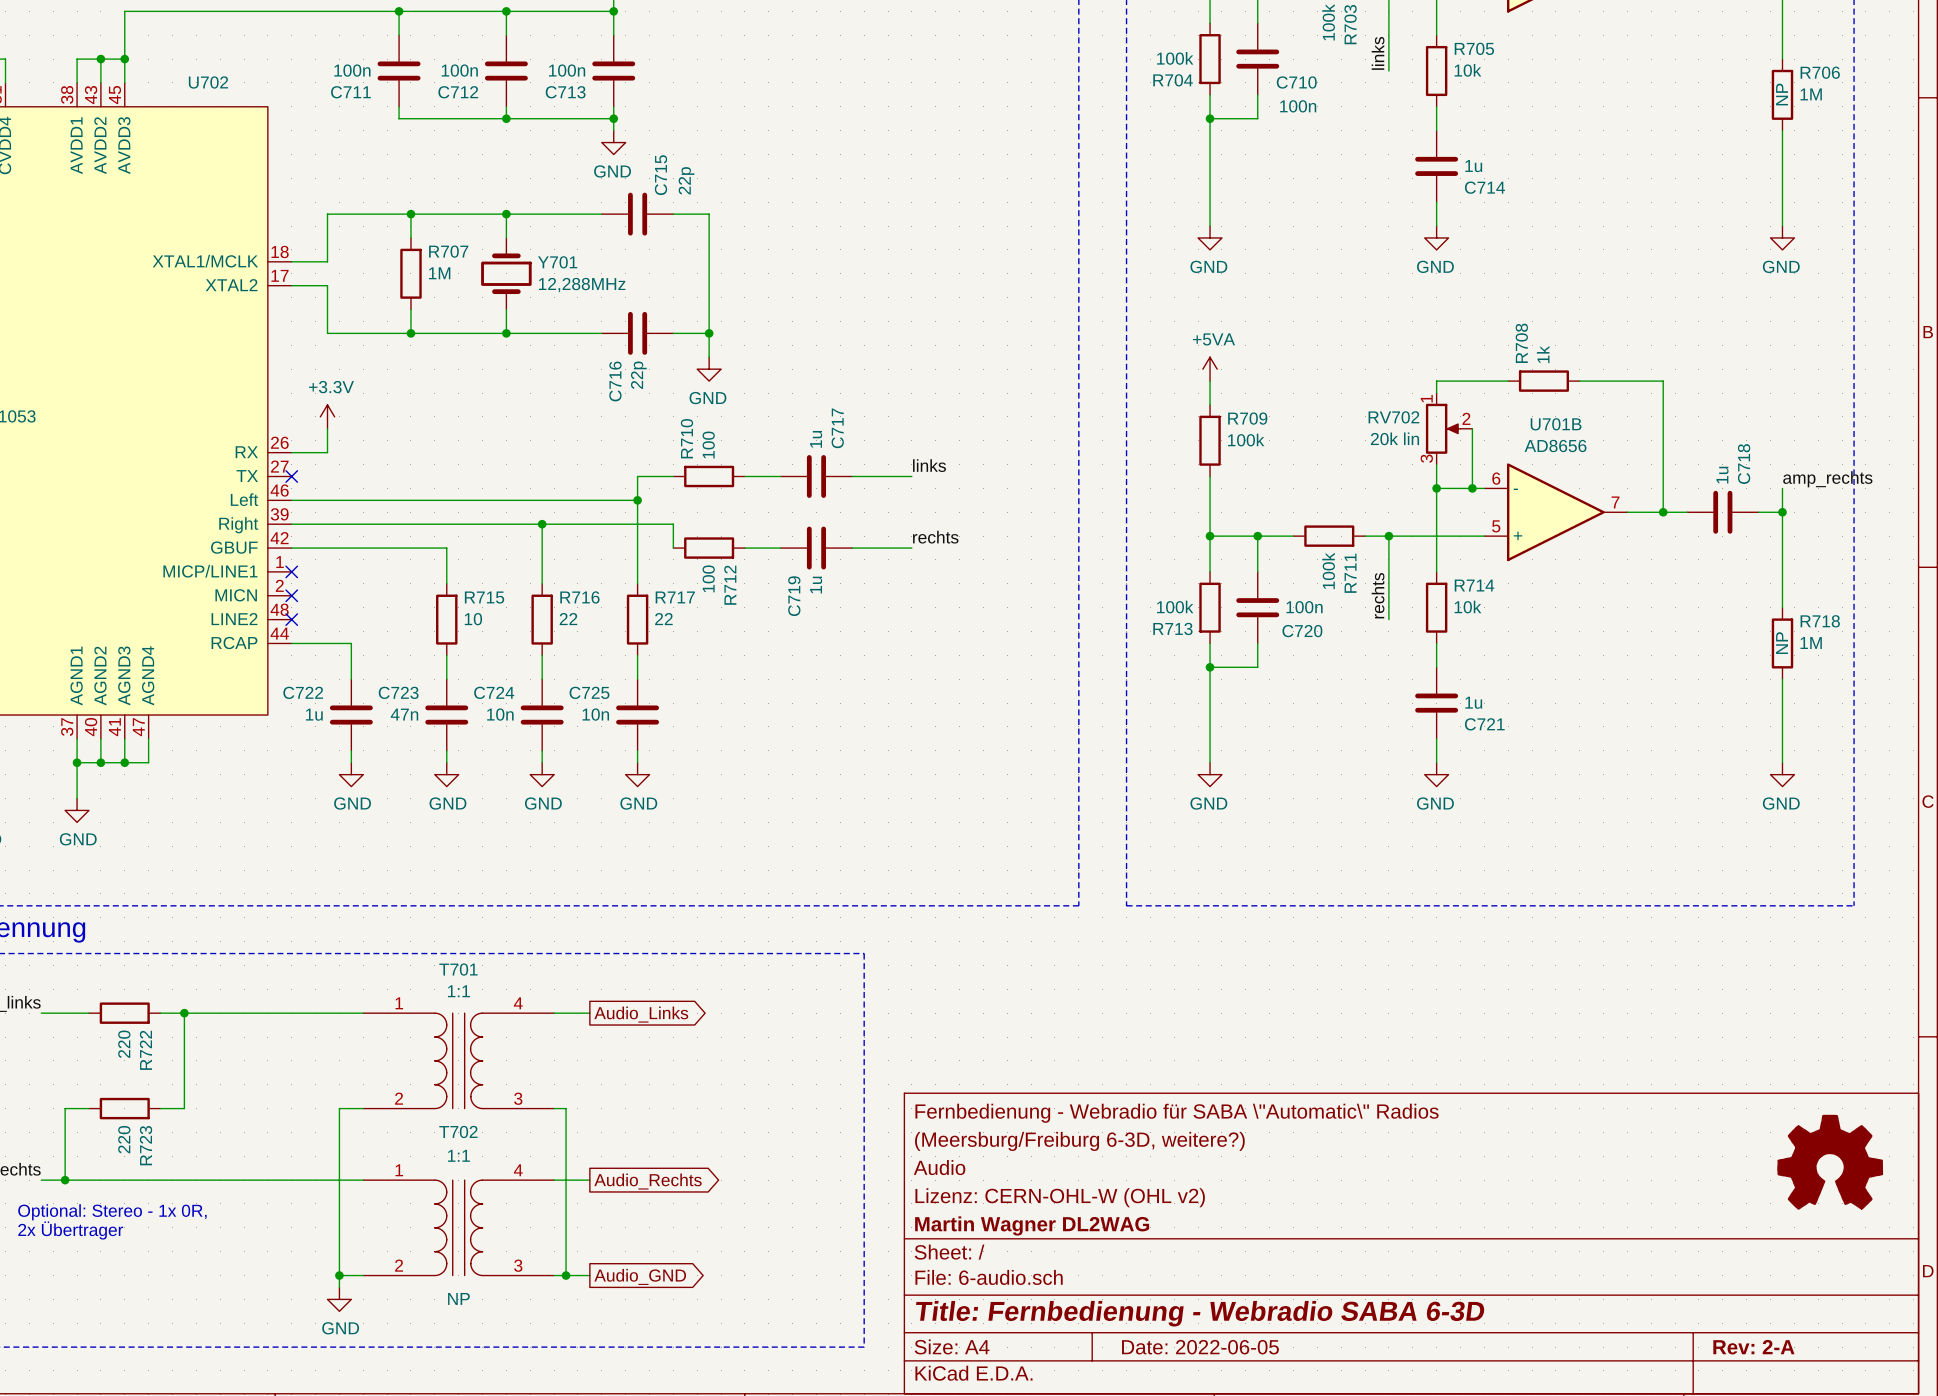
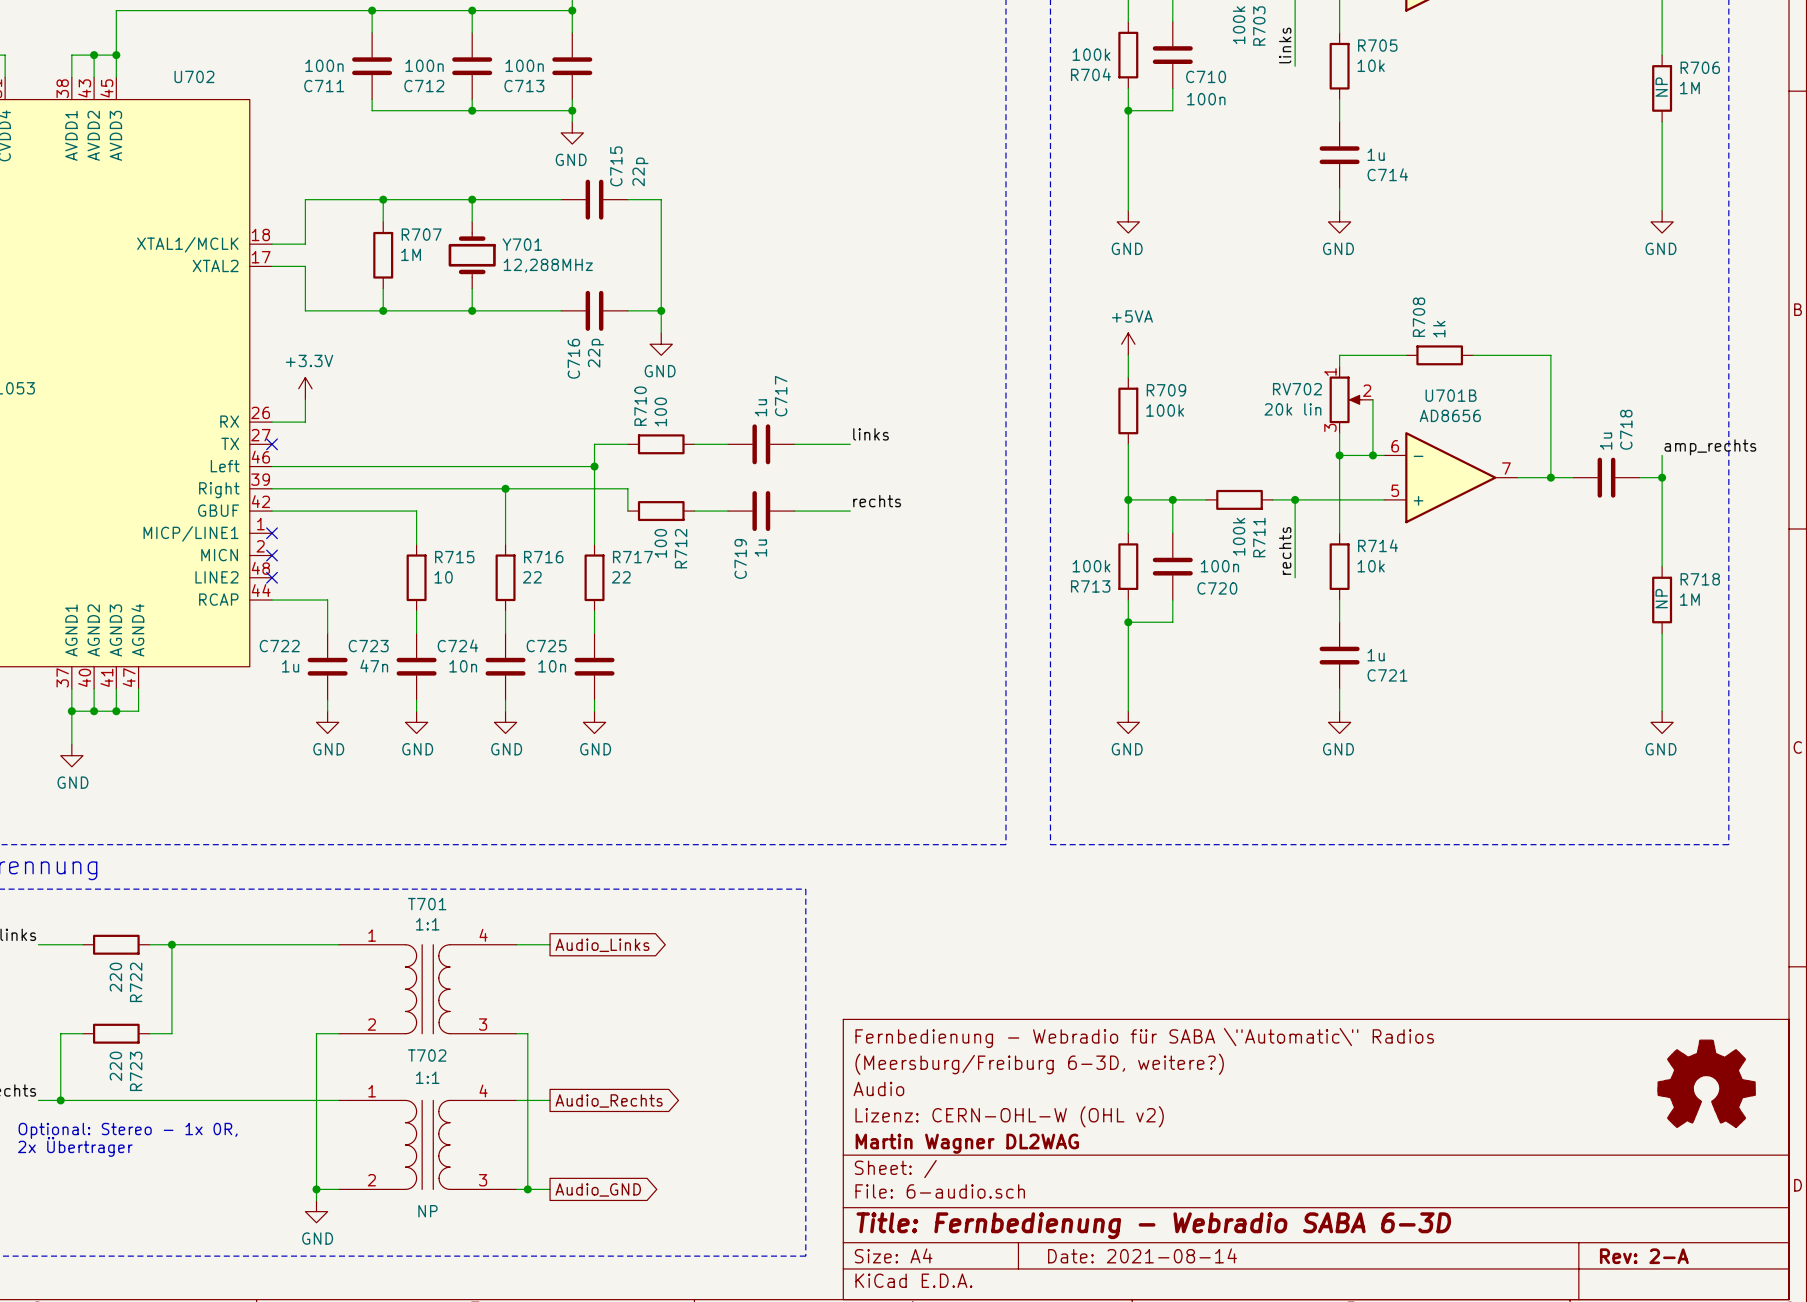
title block: Date: 2022-06-05 (1200, 1347) -> Date: 2021-08-14 (1142, 1255)

